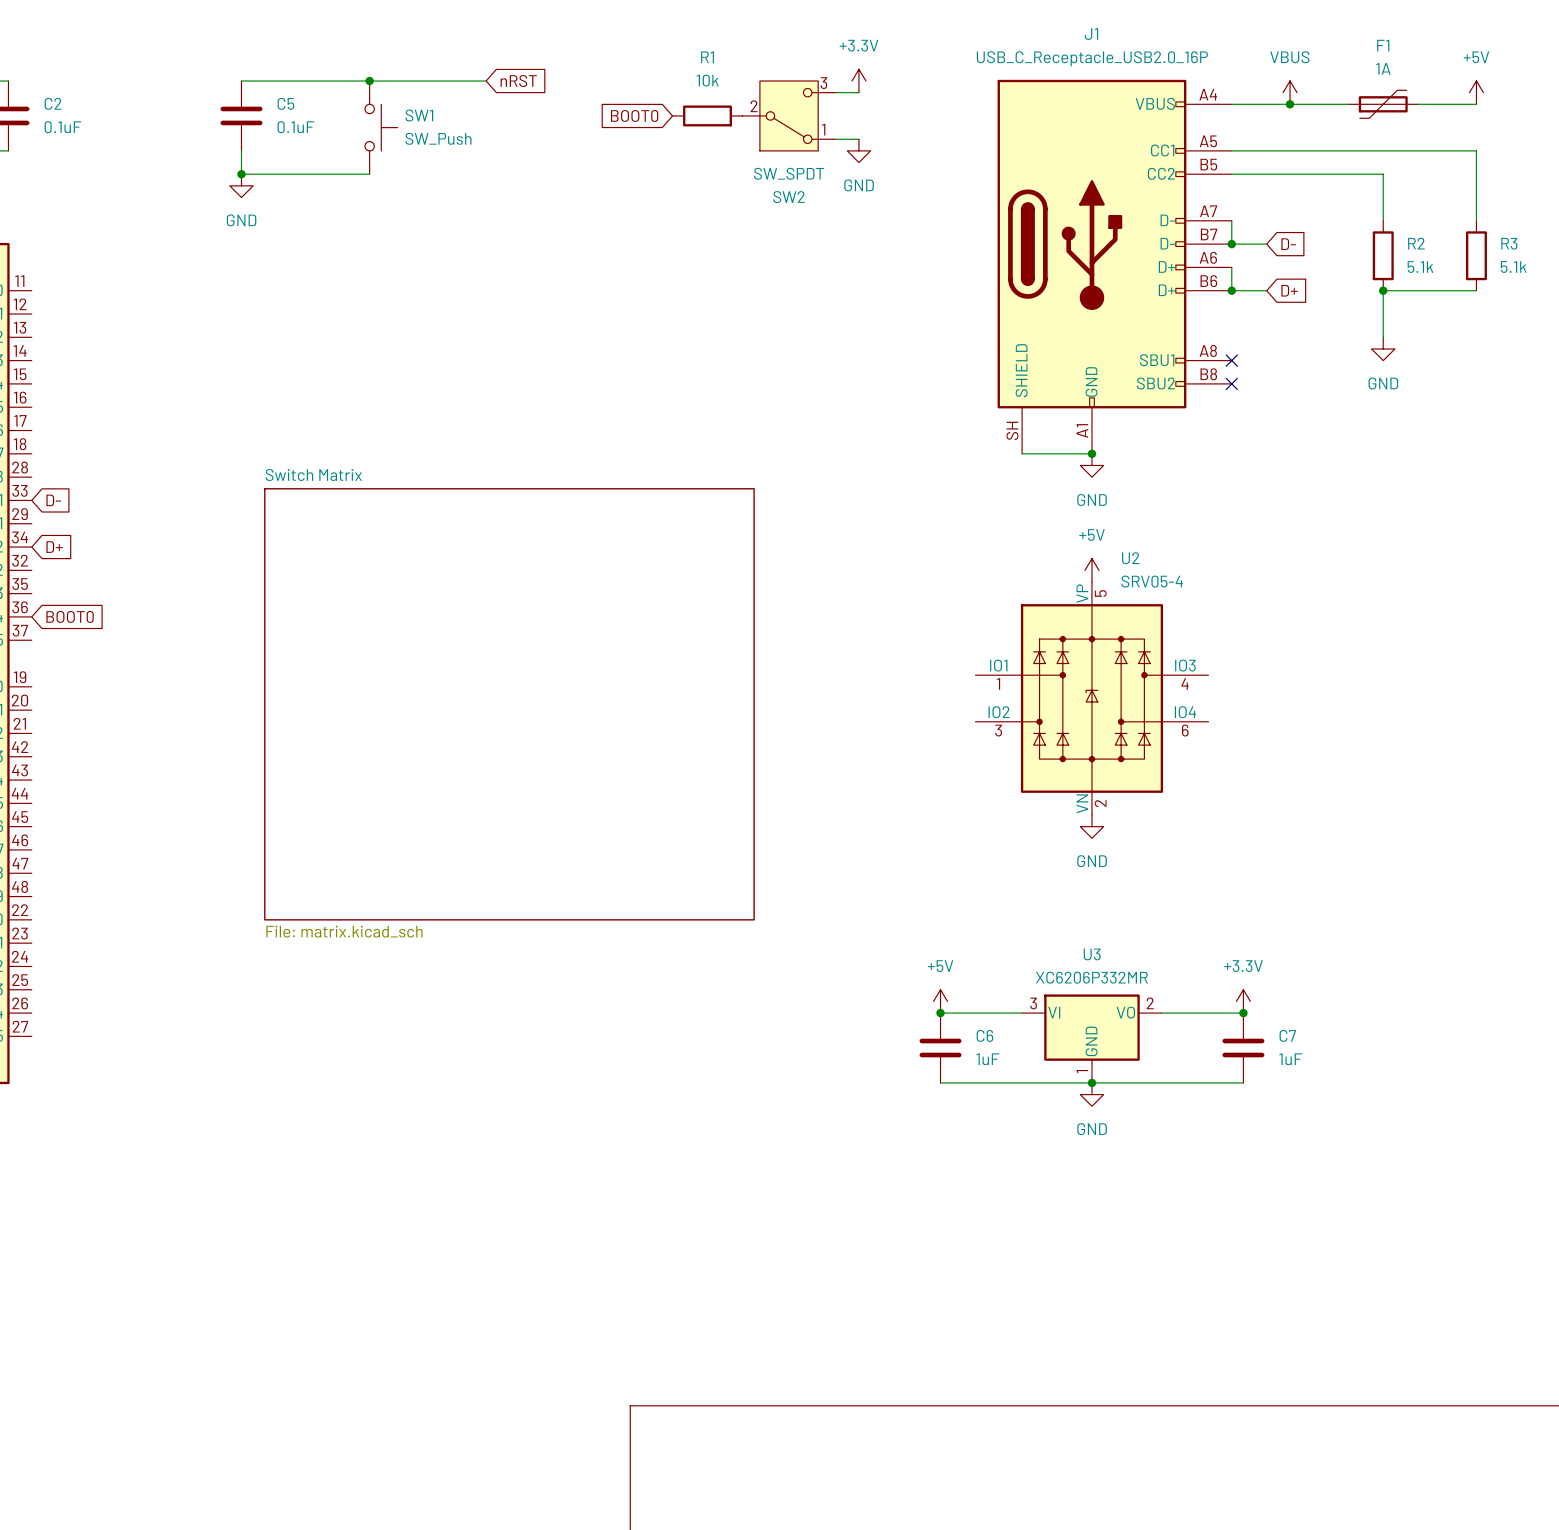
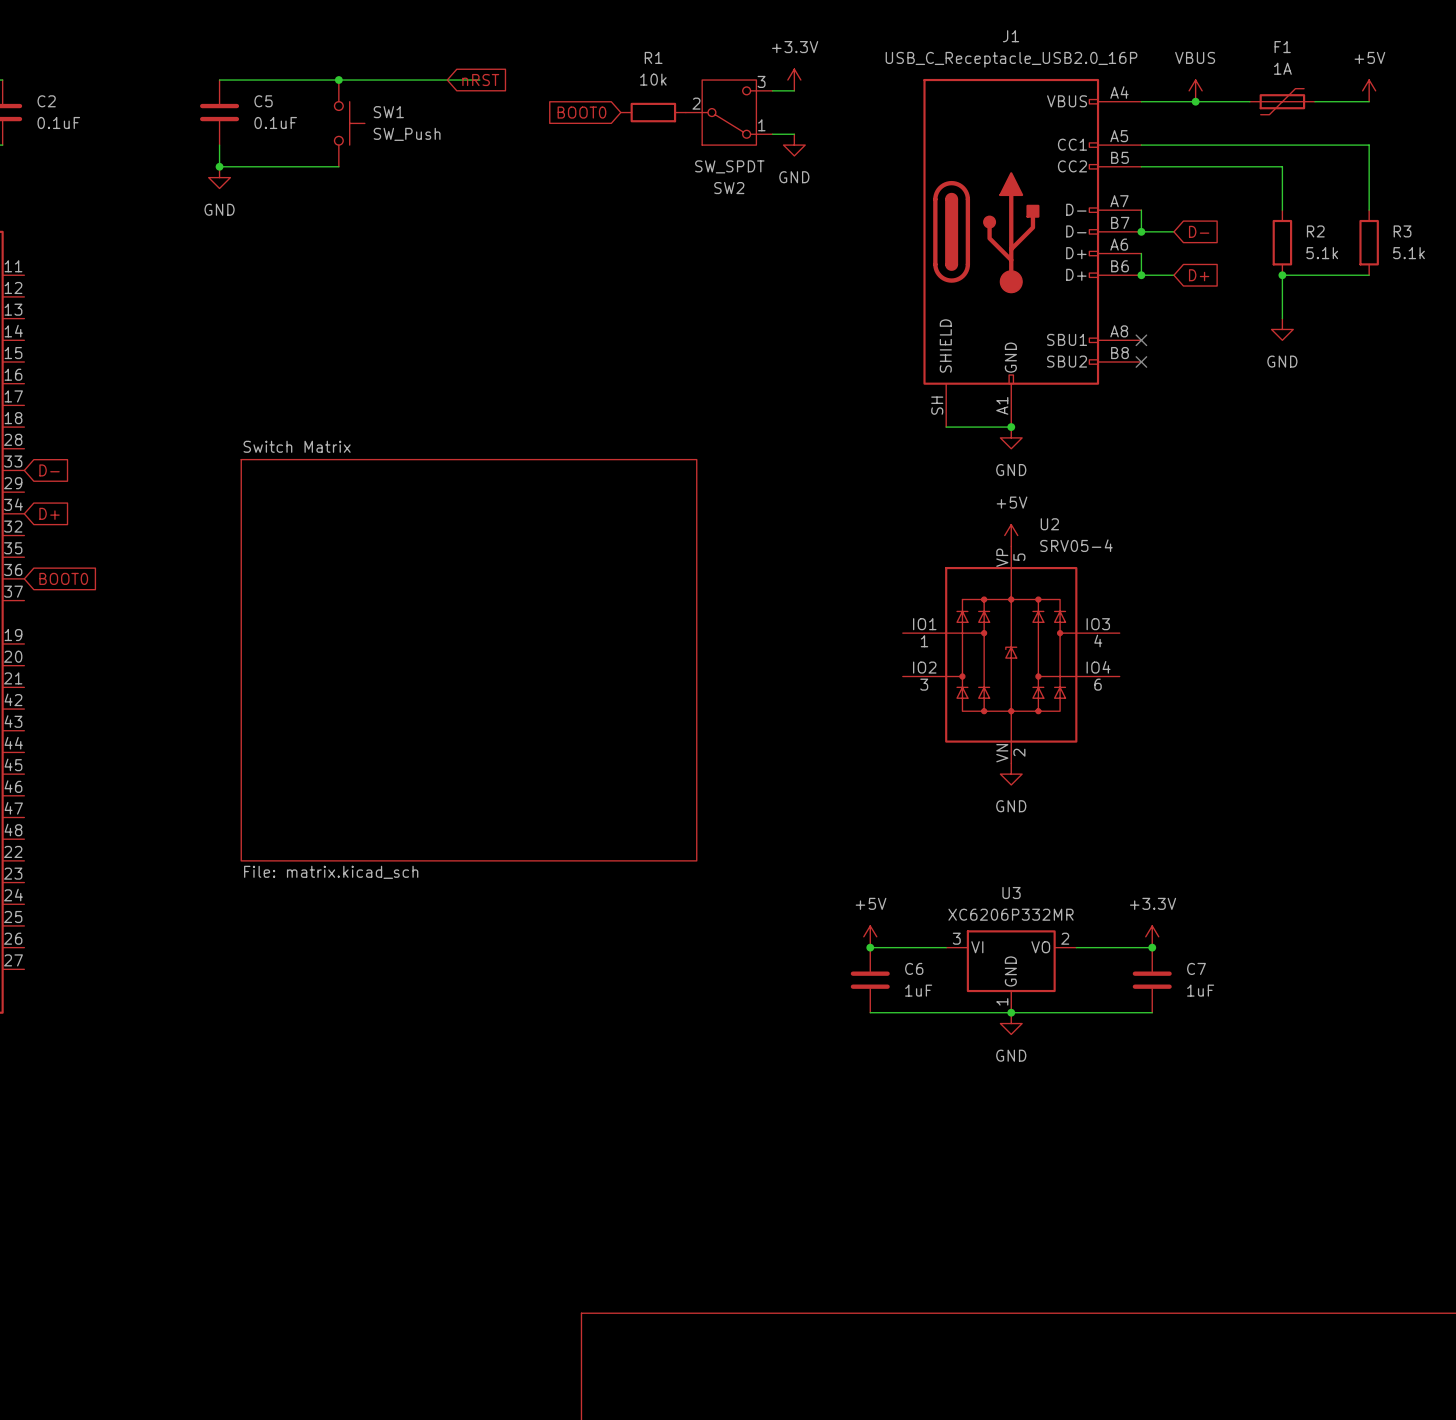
wire: none -> (447, 80) (479, 80)

